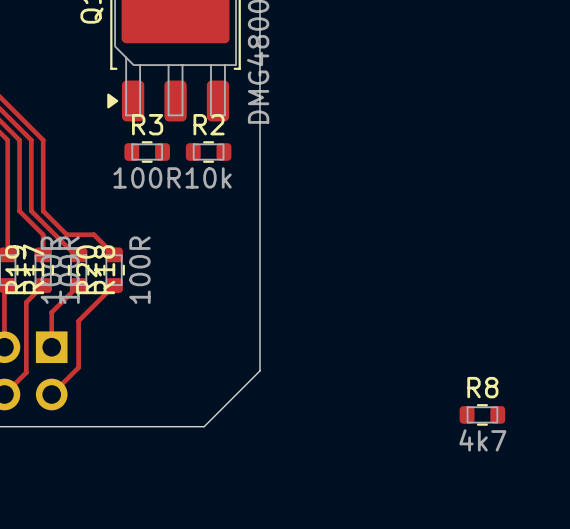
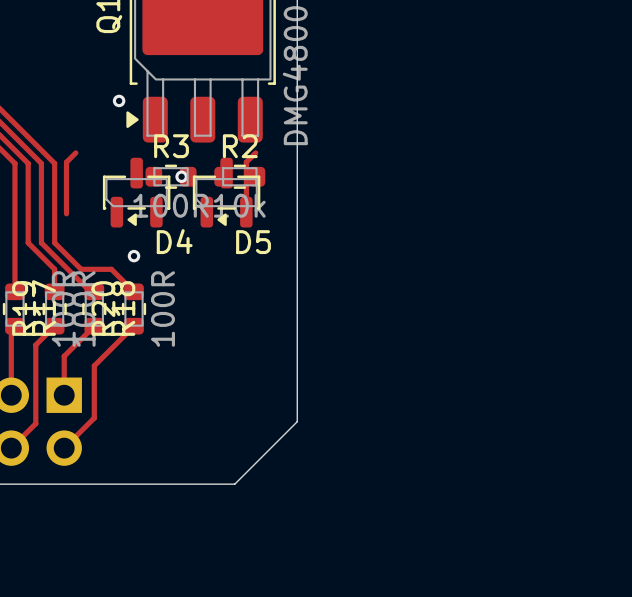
via: none -> (119, 100)
track: none -> (75, 152) (66, 162) (66, 213)
track: none -> (255, 152) (246, 162) (246, 212)
via: none -> (181, 176)
D4: none -> (136, 192)
D5: none -> (226, 192)
via: none -> (134, 256)
R8: 4k7 (482, 414) -> none

